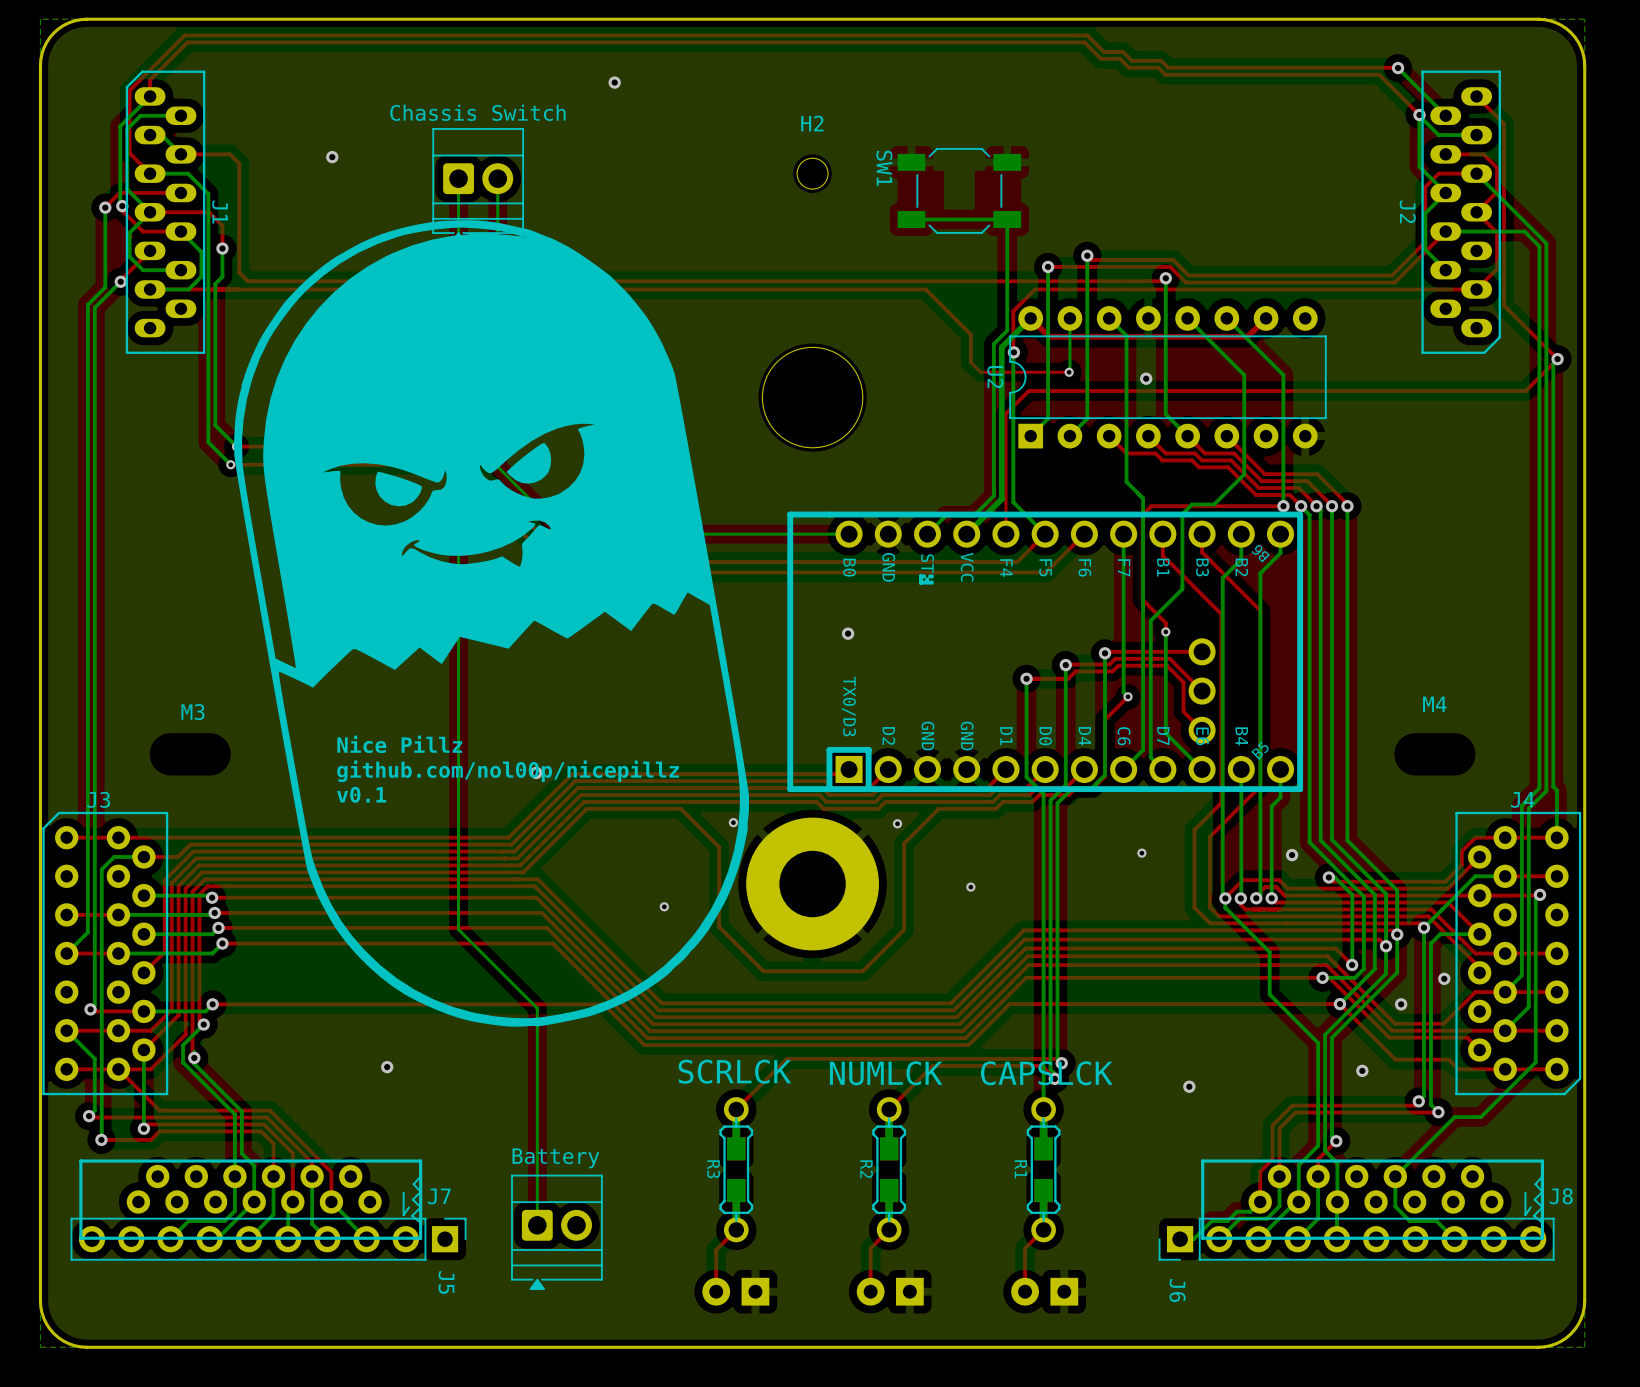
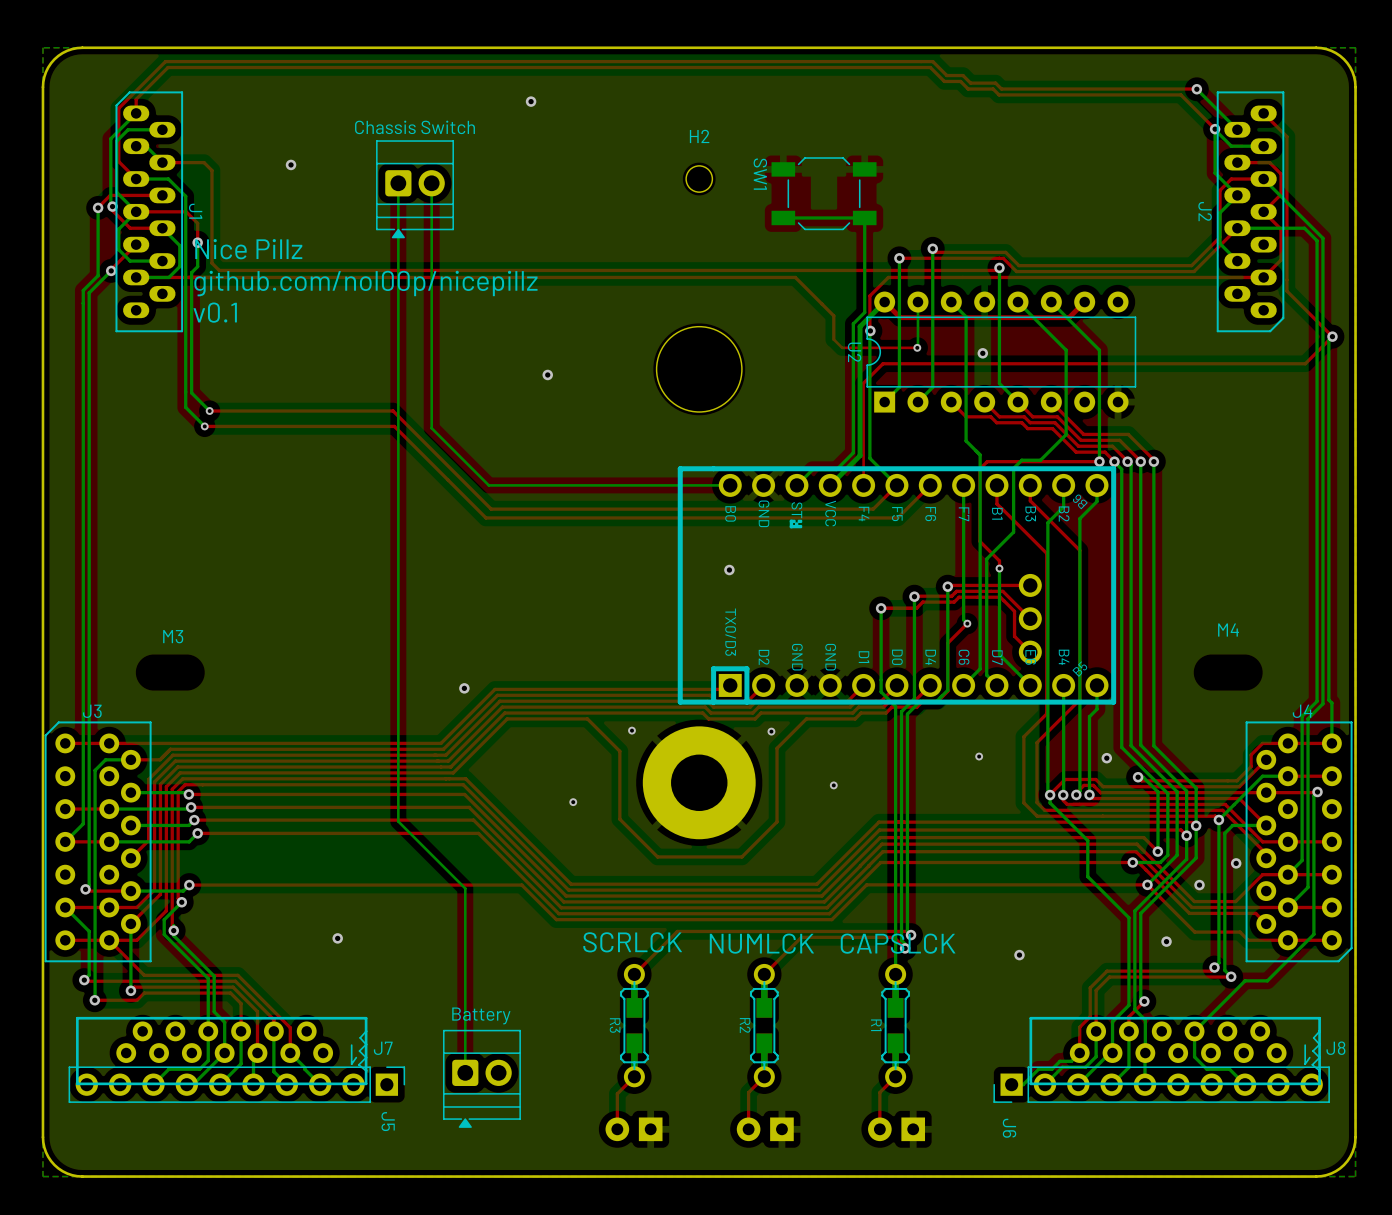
text: none -> Nice Pillz (248, 249)
text: none -> github.com/nol00p/nicepillz (365, 283)
text: none -> v0.1 (215, 312)
part: (491, 623) -> none
text: Nice Pillz (399, 744) -> none
text: github.com/nol00p/nicepillz (508, 771) -> none
text: v0.1 (361, 794) -> none

